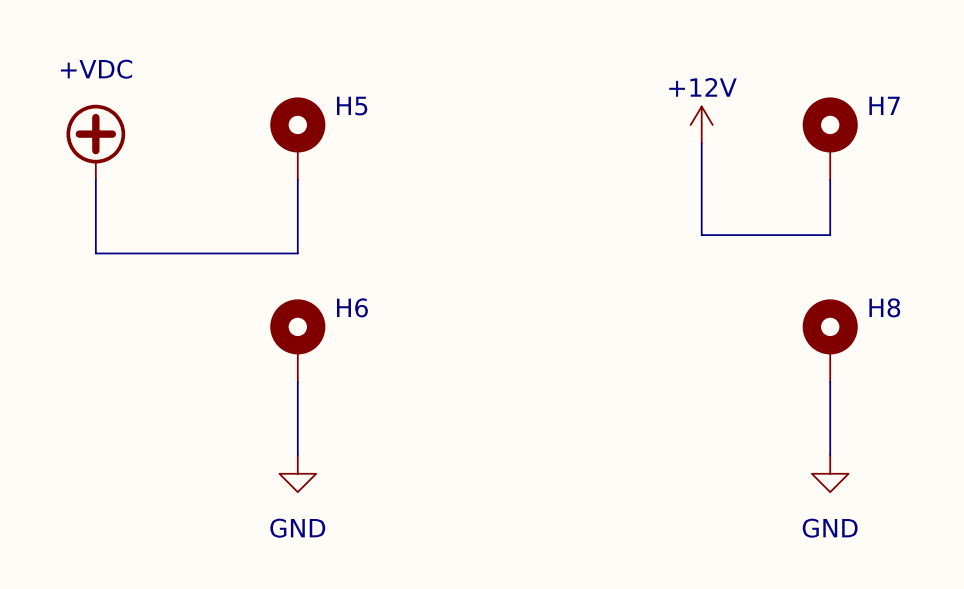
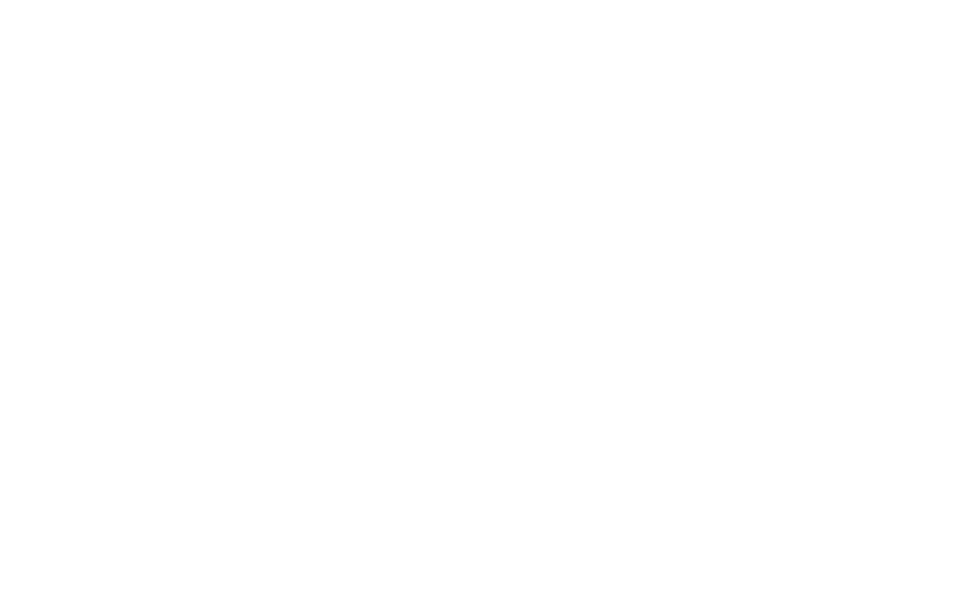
power symbol: +12V (701, 124) -> none
H5: (297, 138) -> none
H7: (830, 138) -> none
power symbol: +VDC (95, 142) -> none
wire: (701, 143) (701, 235) (830, 235) (830, 180) -> none
wire: (95, 180) (95, 253) (297, 253) (297, 180) -> none
H6: (297, 340) -> none
H8: (830, 340) -> none
wire: (297, 381) (297, 455) -> none
wire: (830, 381) (830, 455) -> none
power symbol: GND (297, 473) -> none
power symbol: GND (830, 473) -> none

